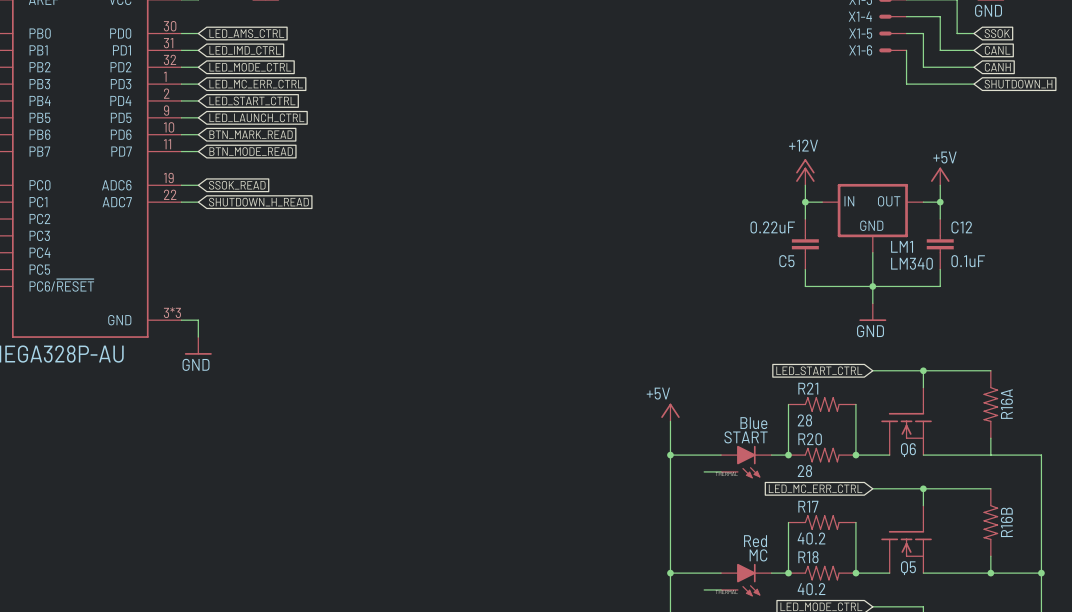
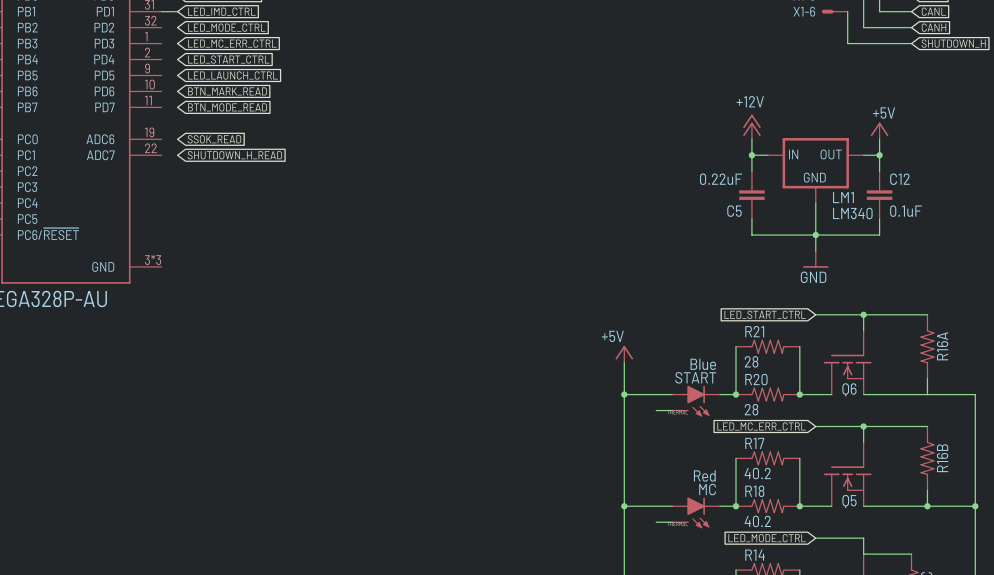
wire: (181, 67) (198, 67) -> none
wire: (181, 84) (198, 84) -> none
wire: (181, 100) (198, 100) -> none
wire: (181, 117) (198, 117) -> none
wire: (181, 134) (198, 134) -> none
wire: (181, 151) (198, 151) -> none
wire: (181, 185) (198, 185) -> none
wire: (181, 202) (198, 202) -> none
wire: (181, 320) (198, 320) (198, 337) -> none
power symbol: GND (198, 345) -> none

